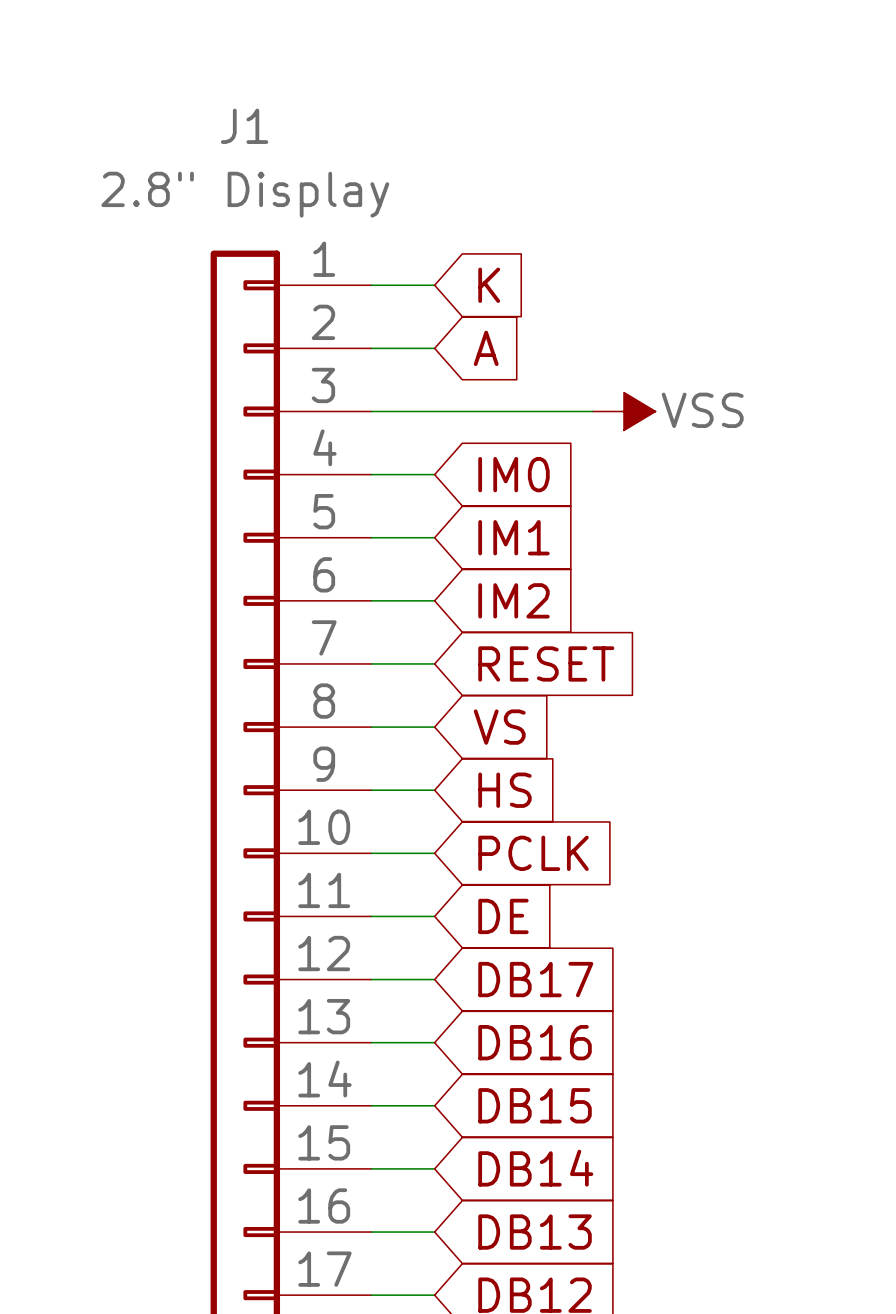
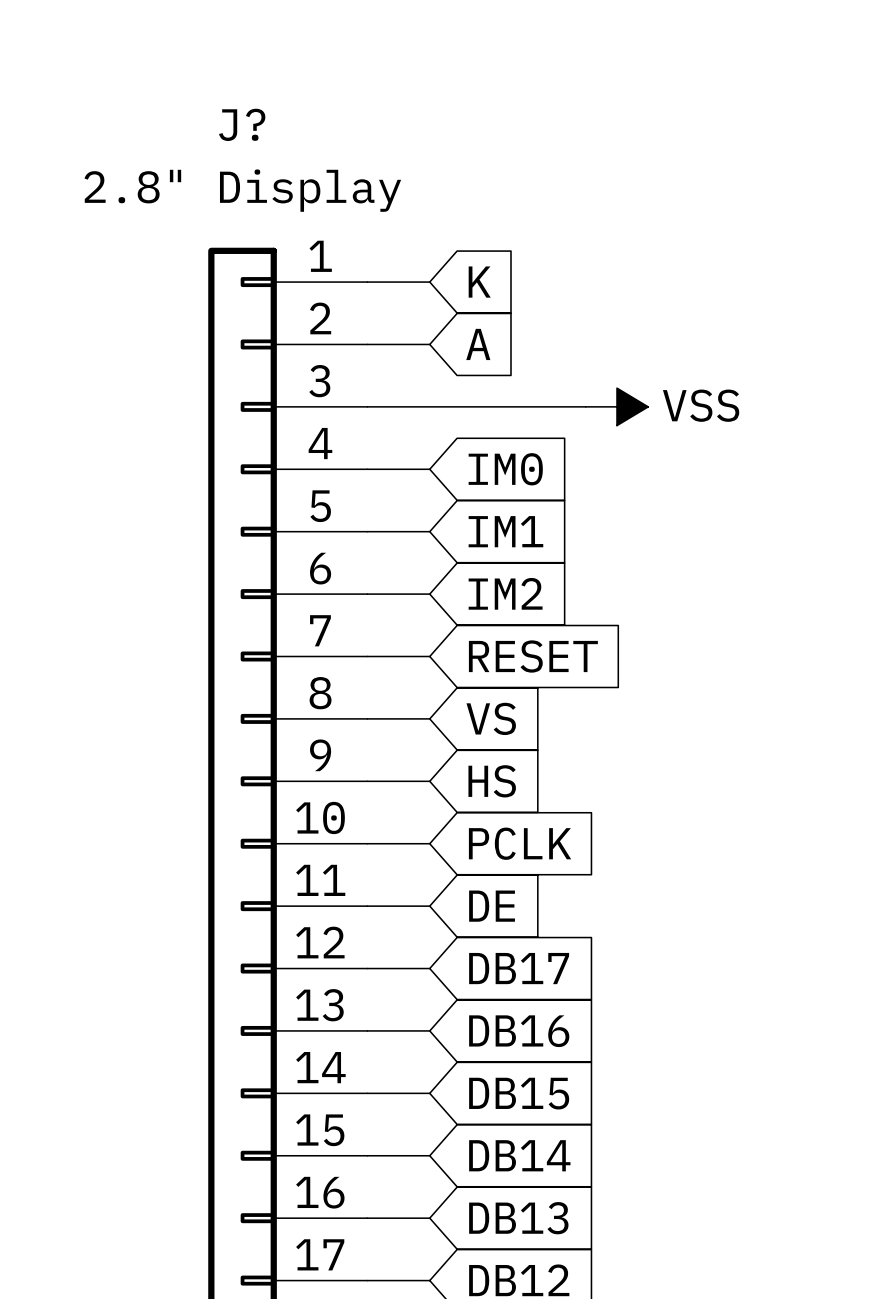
J1 name: J1 (244, 126) -> J? (242, 124)

